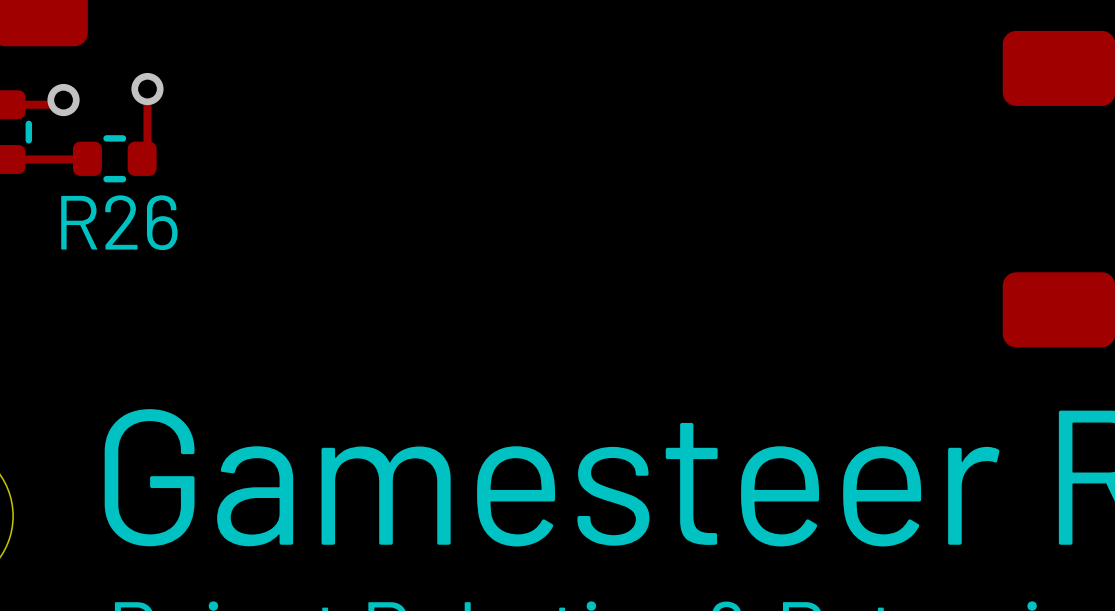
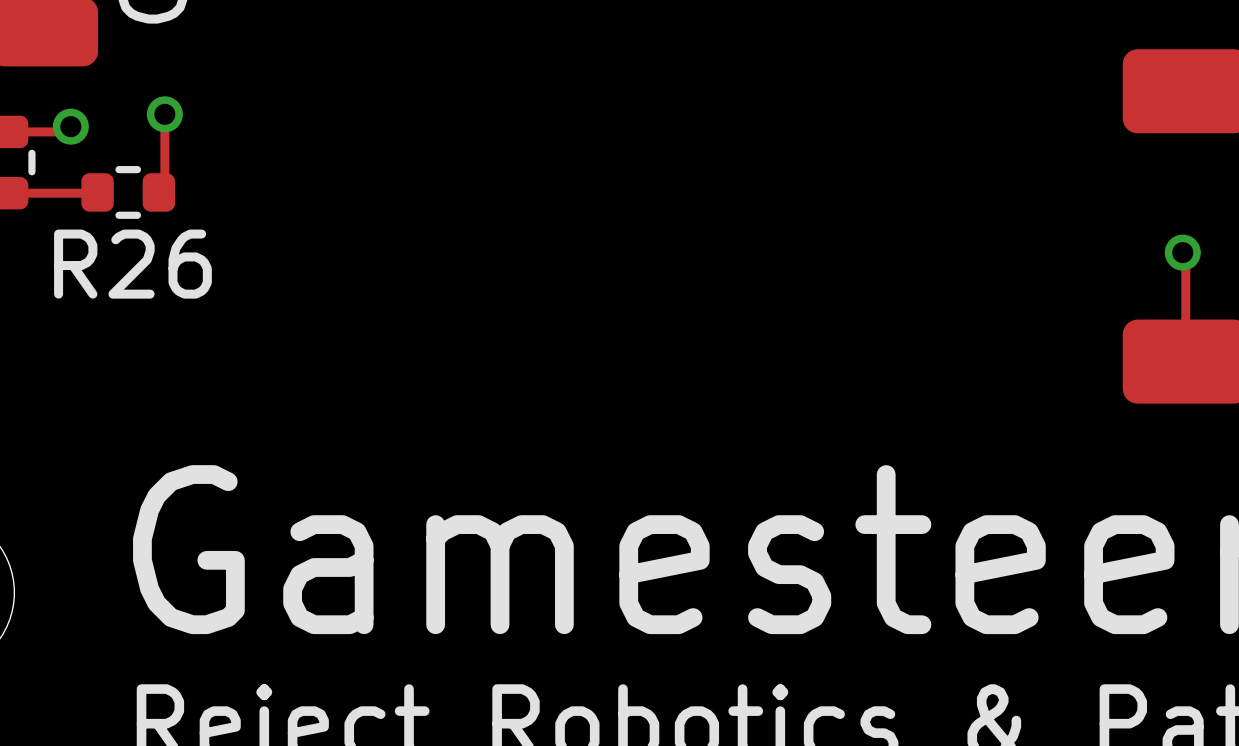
track: none -> (1182, 252) (1185, 255) (1185, 361)
via: none -> (1182, 252)

